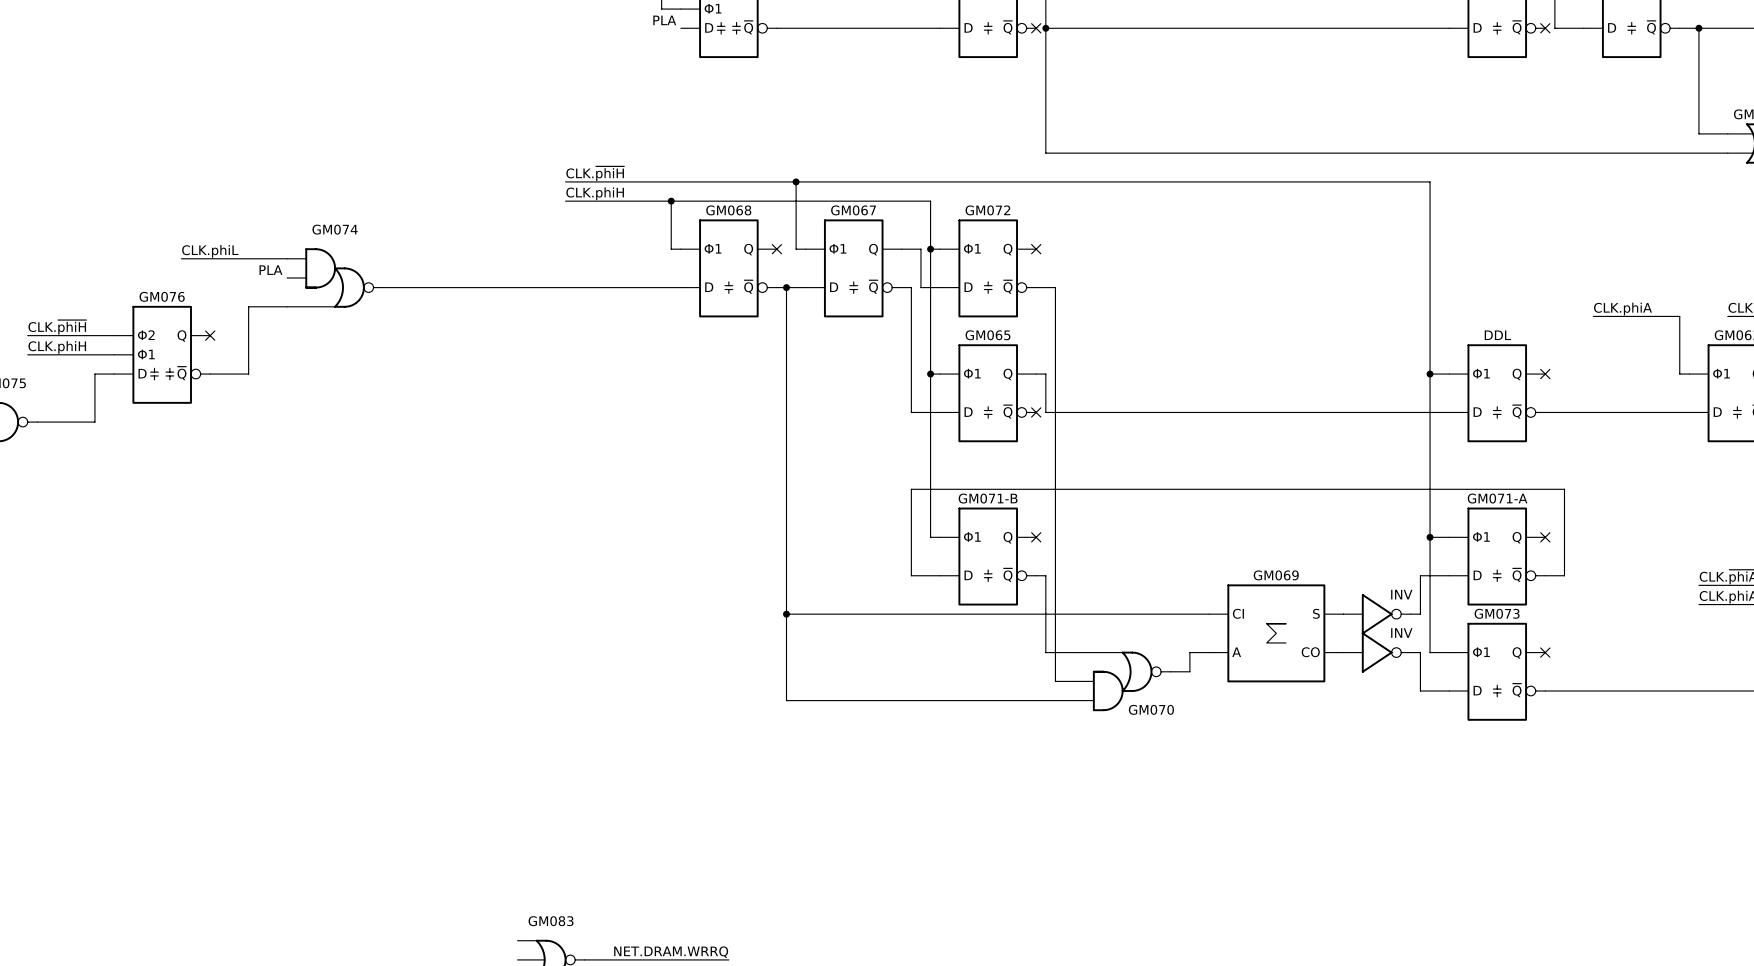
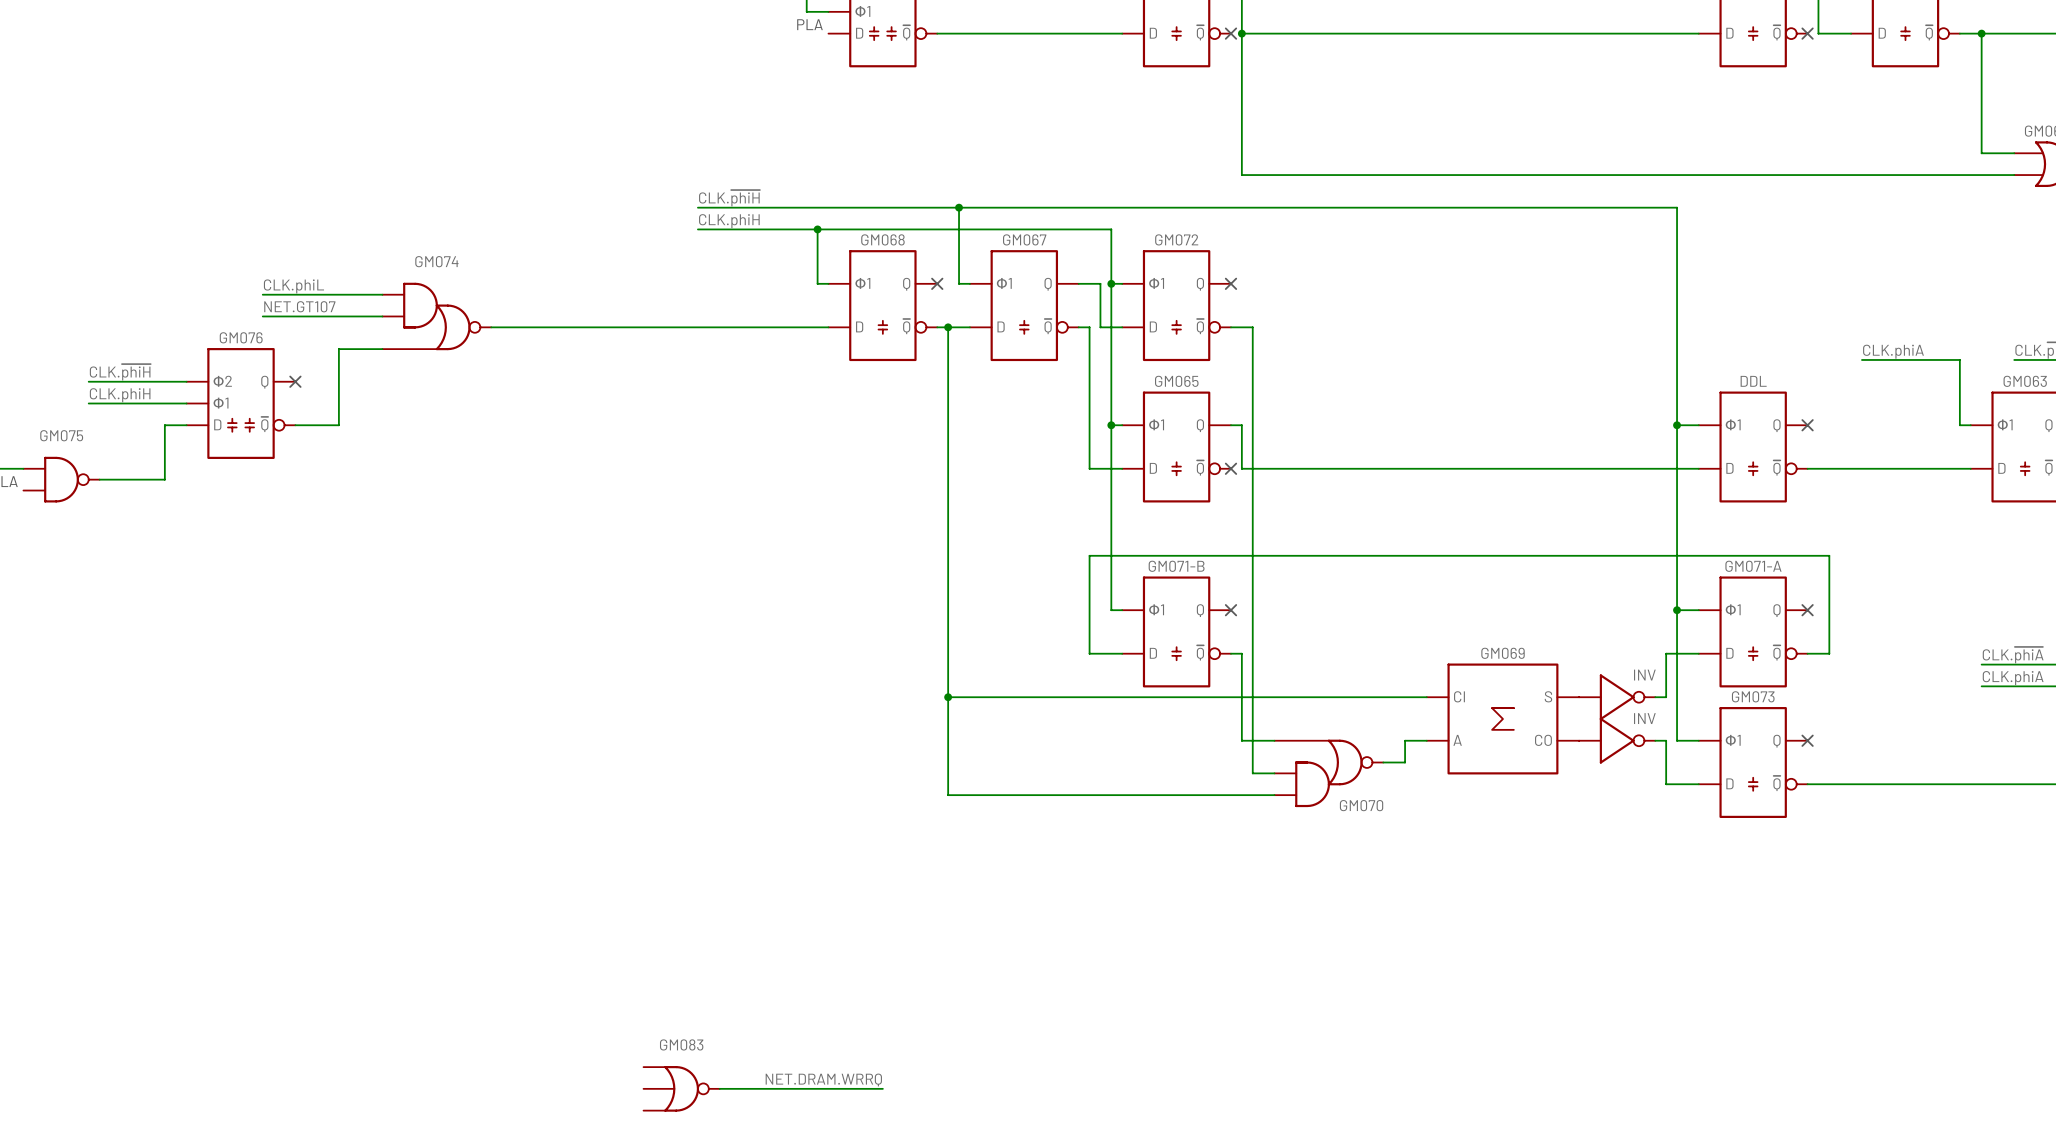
label: none -> NET.GT107 (299, 306)
text: PLA (270, 270) -> none
wire: none -> (262, 316) (382, 316)

